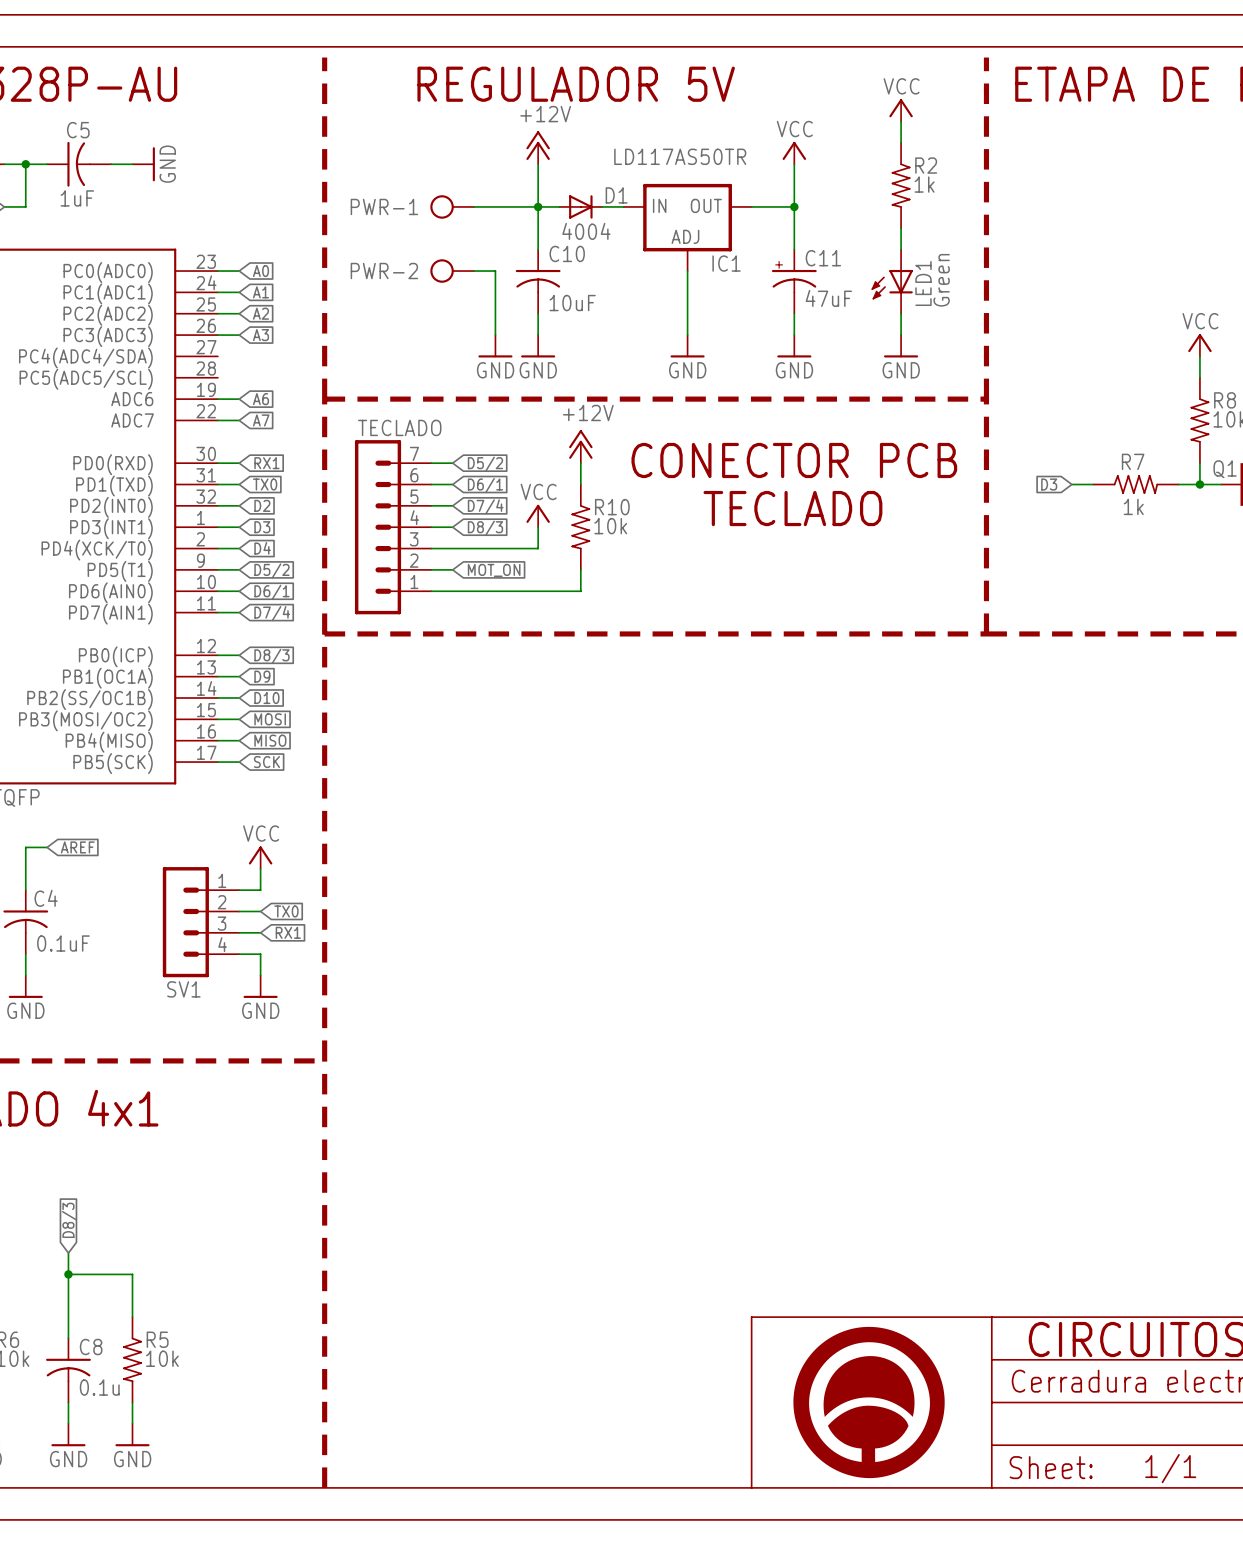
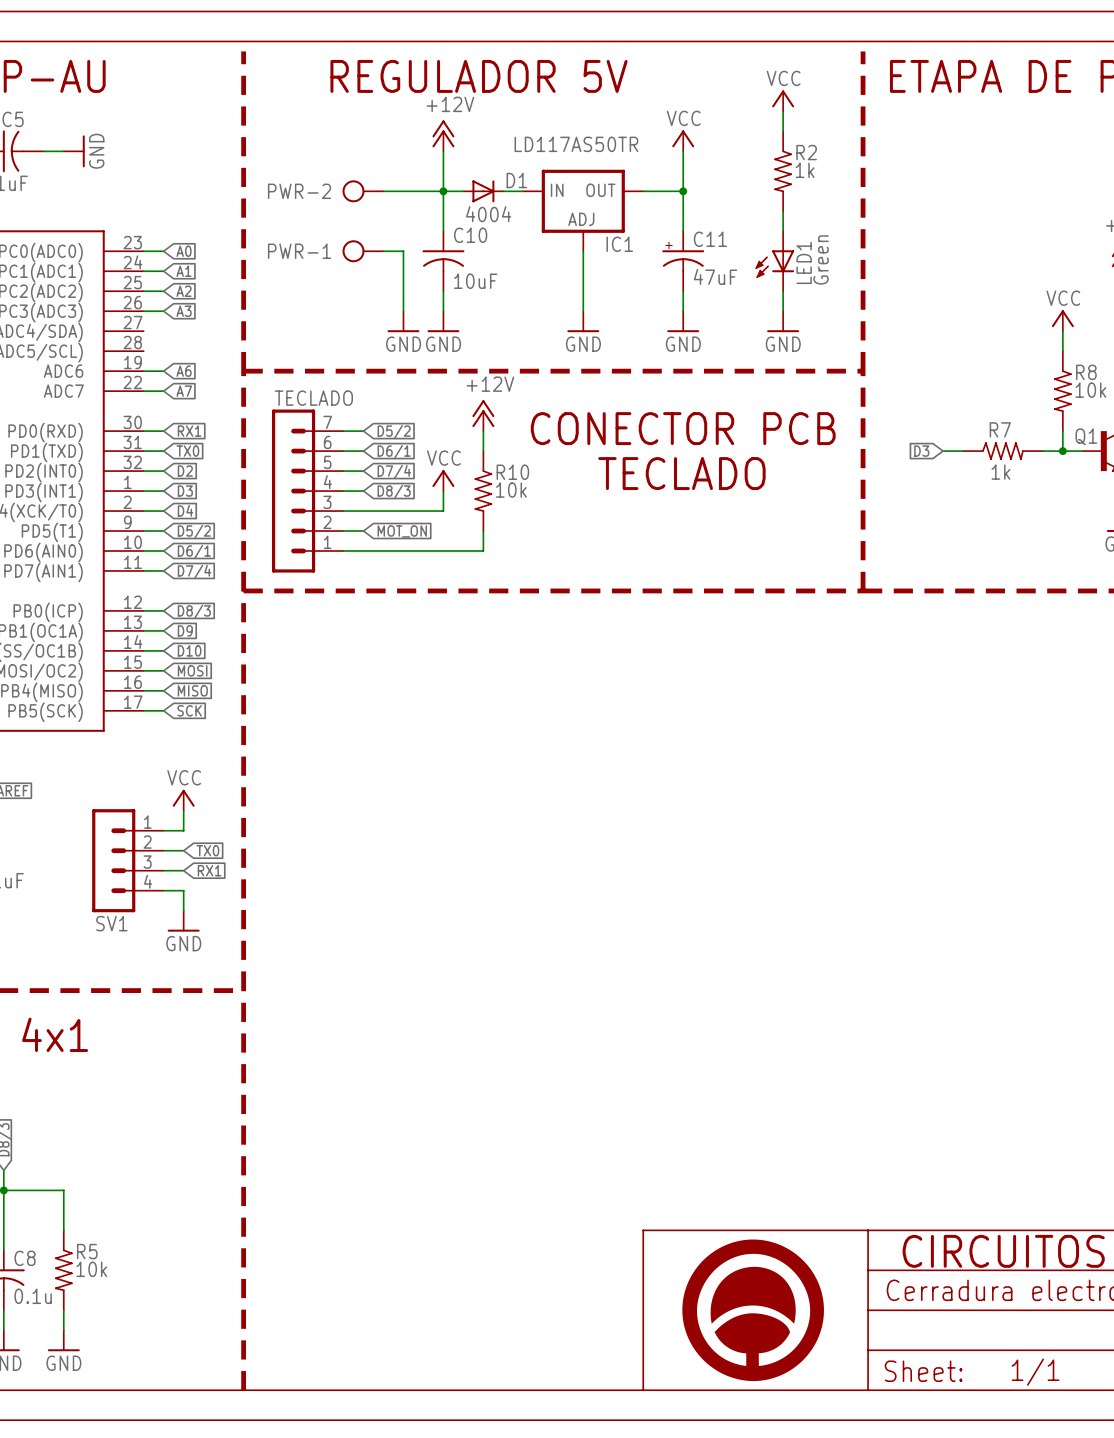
PWR-1 name: PWR-1 (384, 206) -> PWR-2 (299, 191)
PWR-2 name: PWR-2 (384, 271) -> PWR-1 (299, 251)

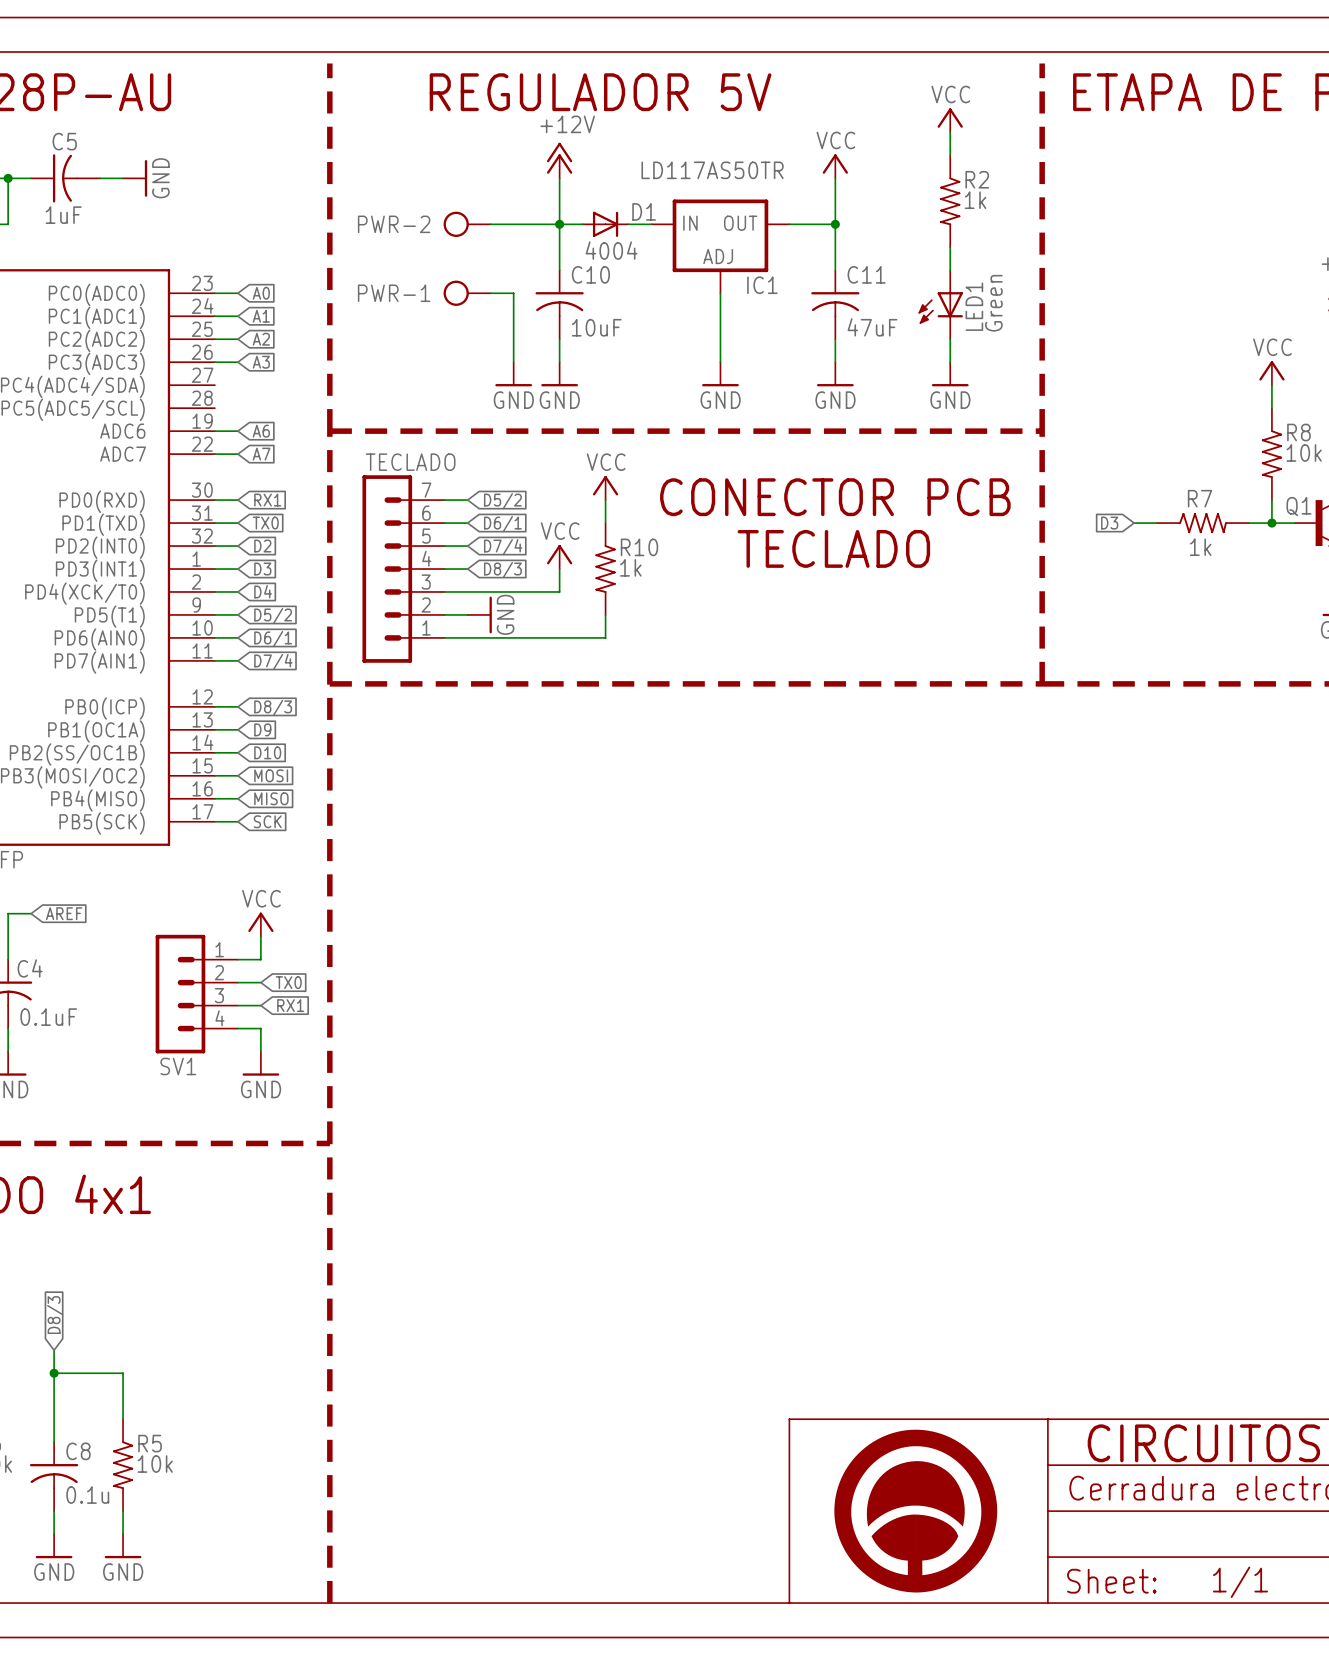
C11 symbol: [662, 231, 705, 292] -> [811, 270, 860, 340]
power symbol: +12V (483, 415) -> VCC (605, 488)
R10 value: 10k (511, 490) -> 1k (630, 567)
power symbol: none -> GND (479, 614)
global label: MOT_ON (402, 531) -> none

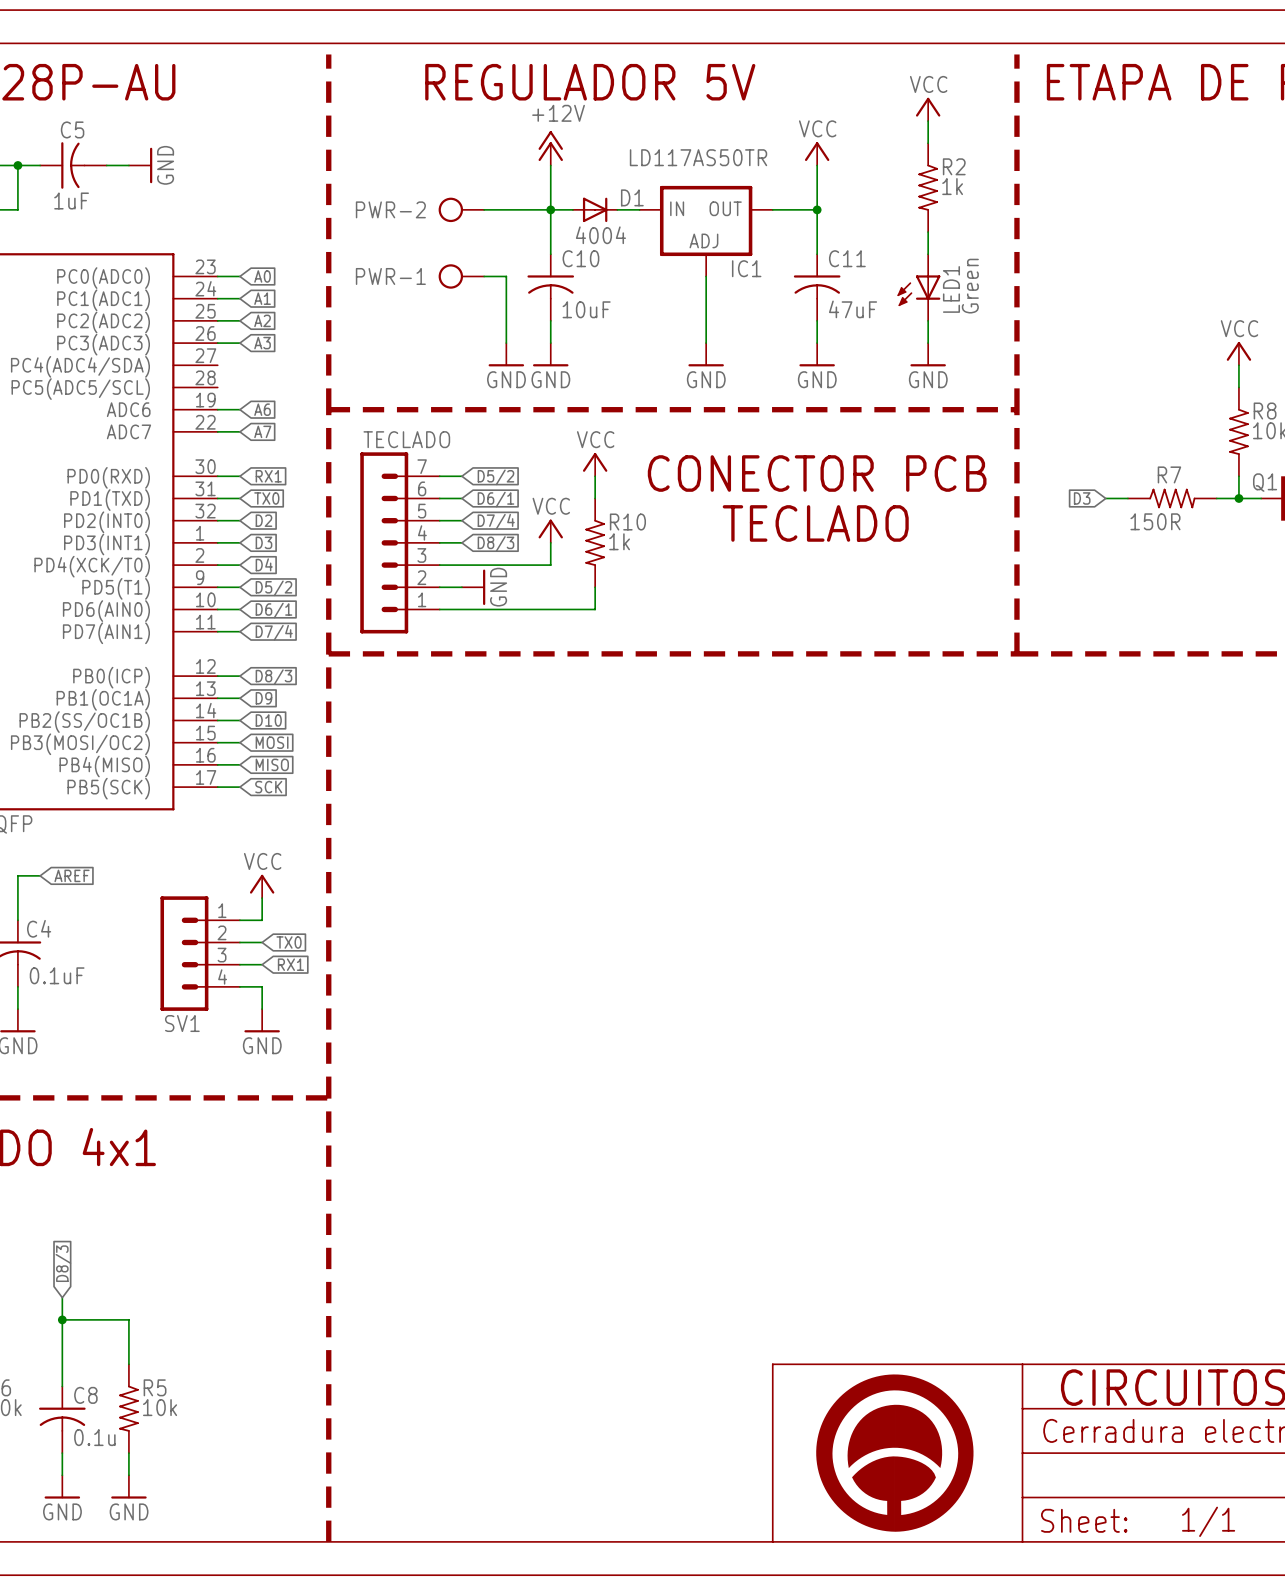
R7 value: 1k (1200, 547) -> 150R (1155, 521)

